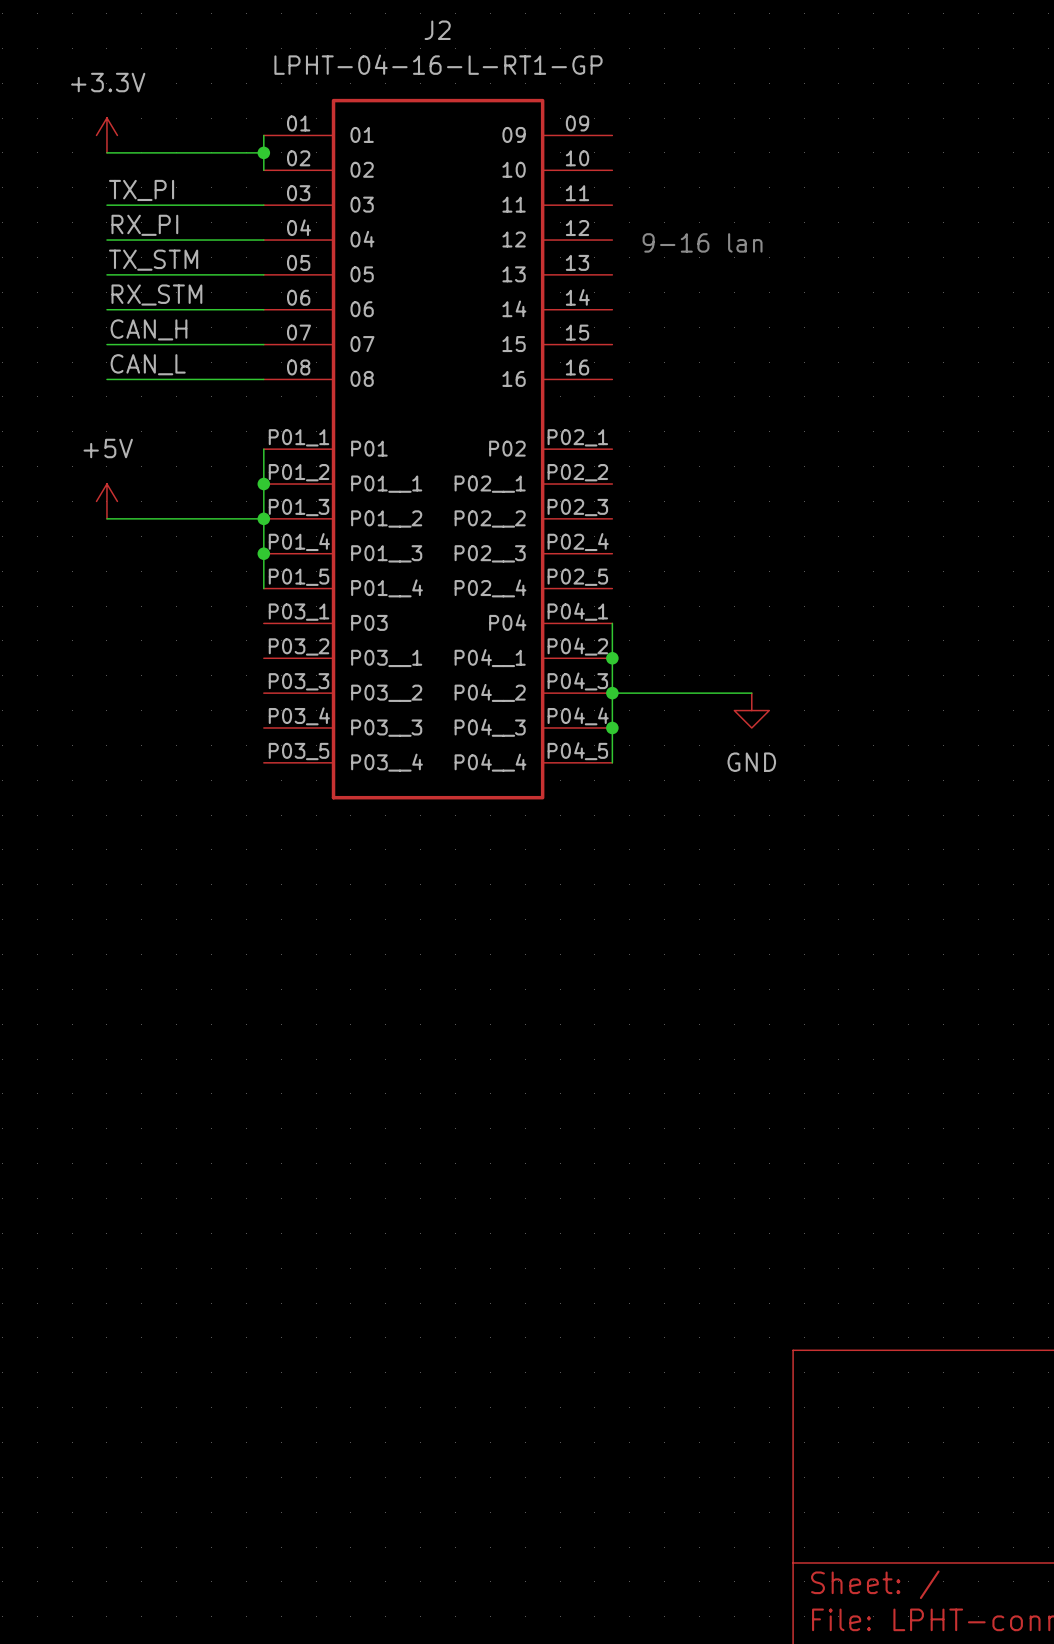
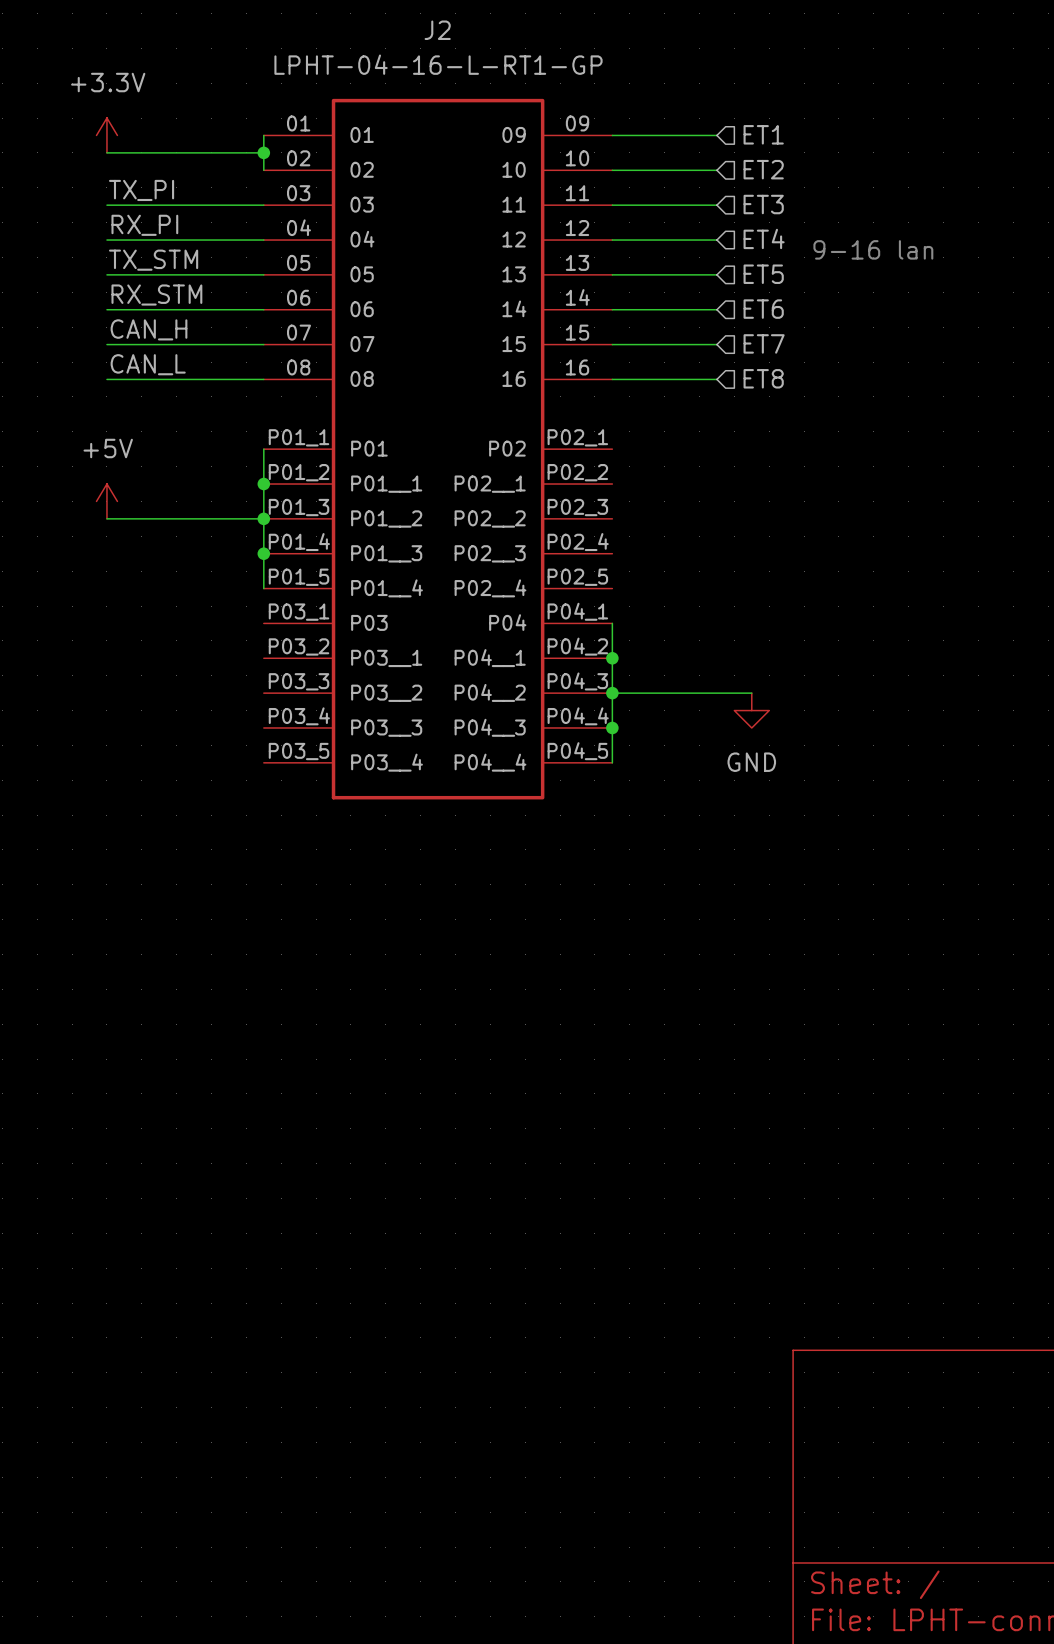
hierarchical label: none -> ET1 (763, 134)
wire: none -> (612, 135) (716, 135)
hierarchical label: none -> ET2 (763, 169)
wire: none -> (612, 170) (716, 170)
hierarchical label: none -> ET3 (763, 204)
wire: none -> (612, 205) (716, 205)
hierarchical label: none -> ET4 (764, 238)
wire: none -> (612, 240) (716, 240)
text position: 9-16 lan (702, 242) -> 9-16 lan (873, 249)
wire: none -> (612, 274) (716, 274)
hierarchical label: none -> ET5 (763, 274)
wire: none -> (612, 309) (716, 309)
hierarchical label: none -> ET6 (763, 309)
hierarchical label: none -> ET7 (764, 343)
wire: none -> (612, 344) (716, 344)
hierarchical label: none -> ET8 (763, 378)
wire: none -> (612, 379) (716, 379)

